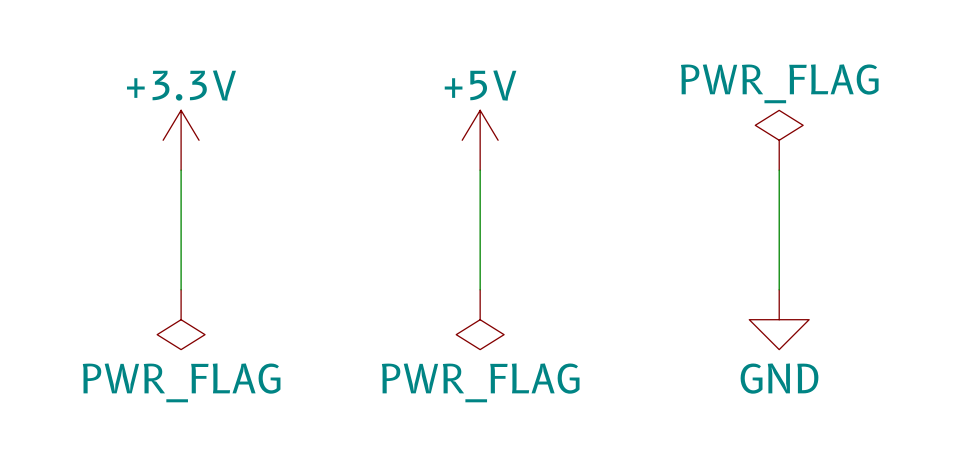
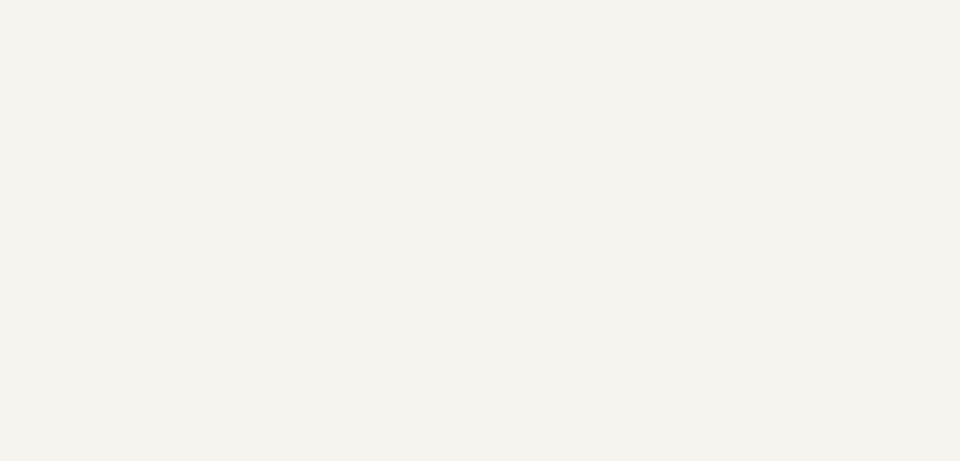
power symbol: +3.3V (181, 140) -> none
power symbol: +5V (480, 140) -> none
power symbol: PWR_FLAG (779, 140) -> none
wire: (181, 170) (181, 289) -> none
wire: (480, 170) (480, 289) -> none
wire: (779, 170) (779, 289) -> none
power symbol: PWR_FLAG (181, 319) -> none
power symbol: PWR_FLAG (480, 319) -> none
power symbol: GND (779, 319) -> none

